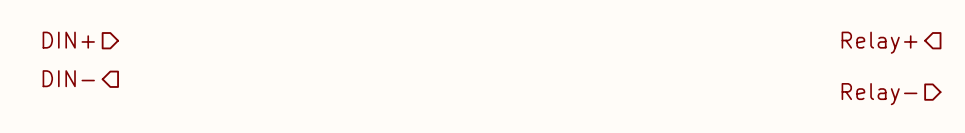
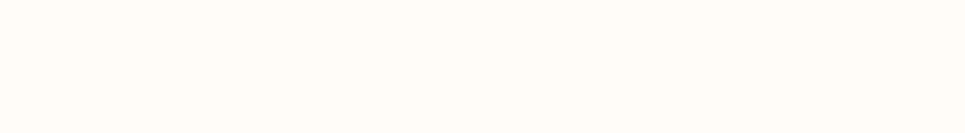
hierarchical label: DIN+ (68, 40) -> none
hierarchical label: Relay+ (879, 42) -> none
hierarchical label: DIN- (68, 78) -> none
hierarchical label: Relay- (879, 94) -> none

